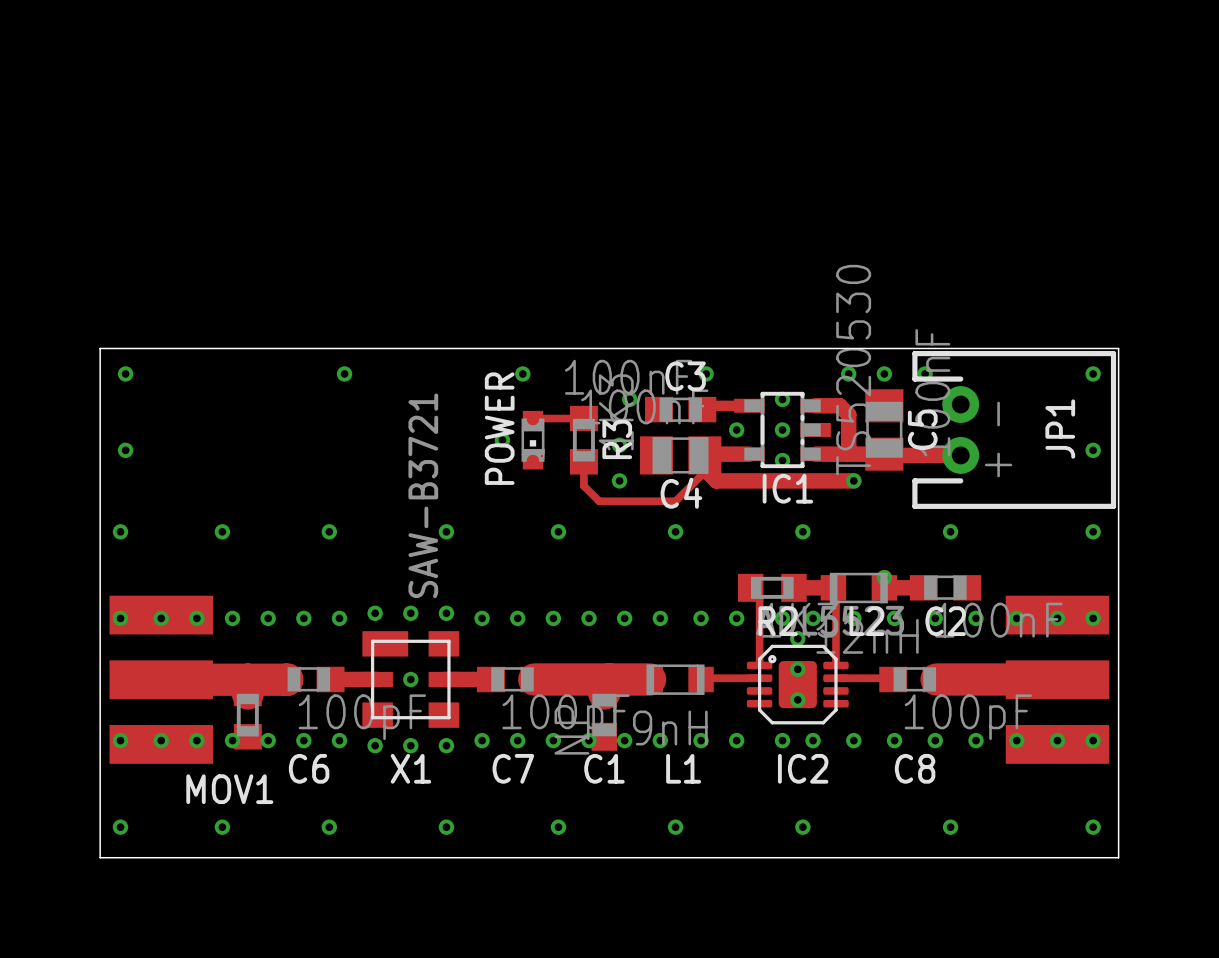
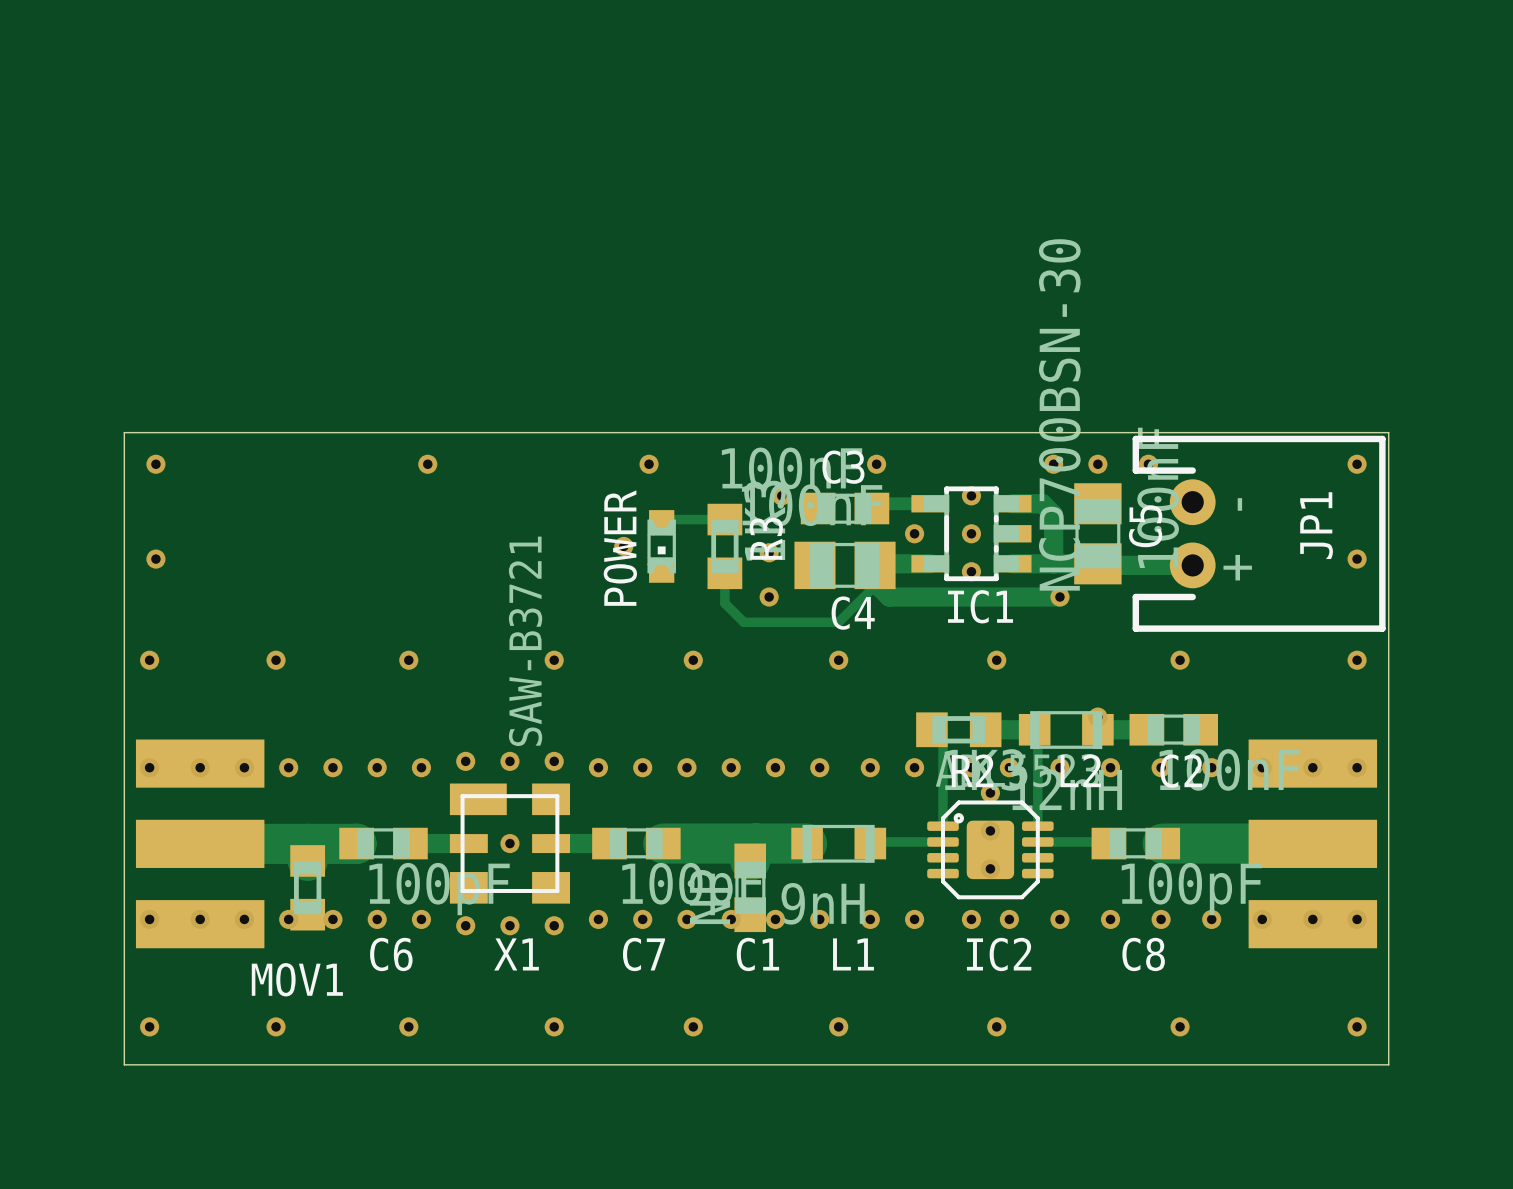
IC1 value: TS520530 (853, 370) -> NCP700BSN-30 (1059, 414)

